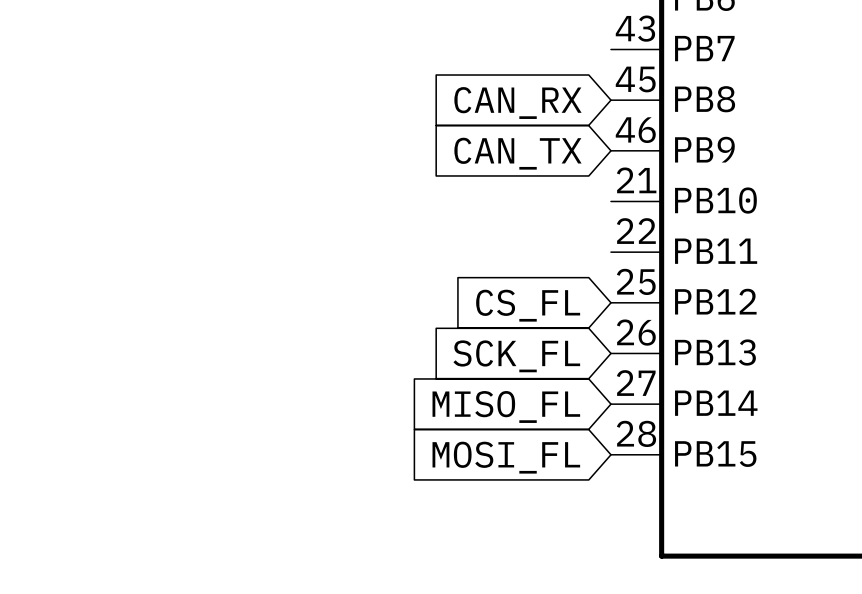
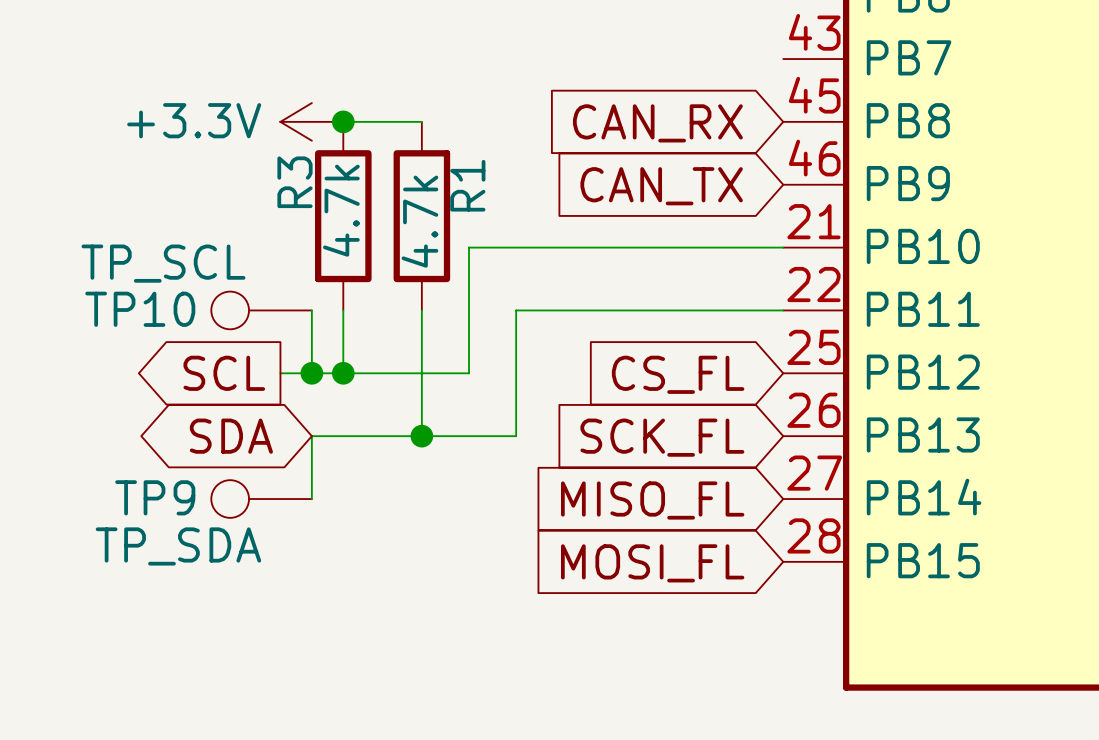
power symbol: none -> +3.3V (311, 121)
wire: none -> (343, 121) (421, 121)
junction: none -> (343, 121)
R3: none -> 4.7k (343, 216)
R1: none -> 4.7k (421, 216)
wire: none -> (783, 247) (469, 247) (469, 373) (280, 373)
TP10: none -> TP_SCL (261, 310)
wire: none -> (311, 310) (311, 373)
wire: none -> (343, 310) (343, 373)
wire: none -> (421, 310) (421, 436)
wire: none -> (783, 310) (516, 310) (516, 436) (311, 436) (311, 499)
global label: none -> SCL (224, 373)
junction: none -> (311, 373)
junction: none -> (343, 373)
global label: none -> SDA (231, 436)
junction: none -> (421, 436)
TP9: none -> TP_SDA (261, 499)

